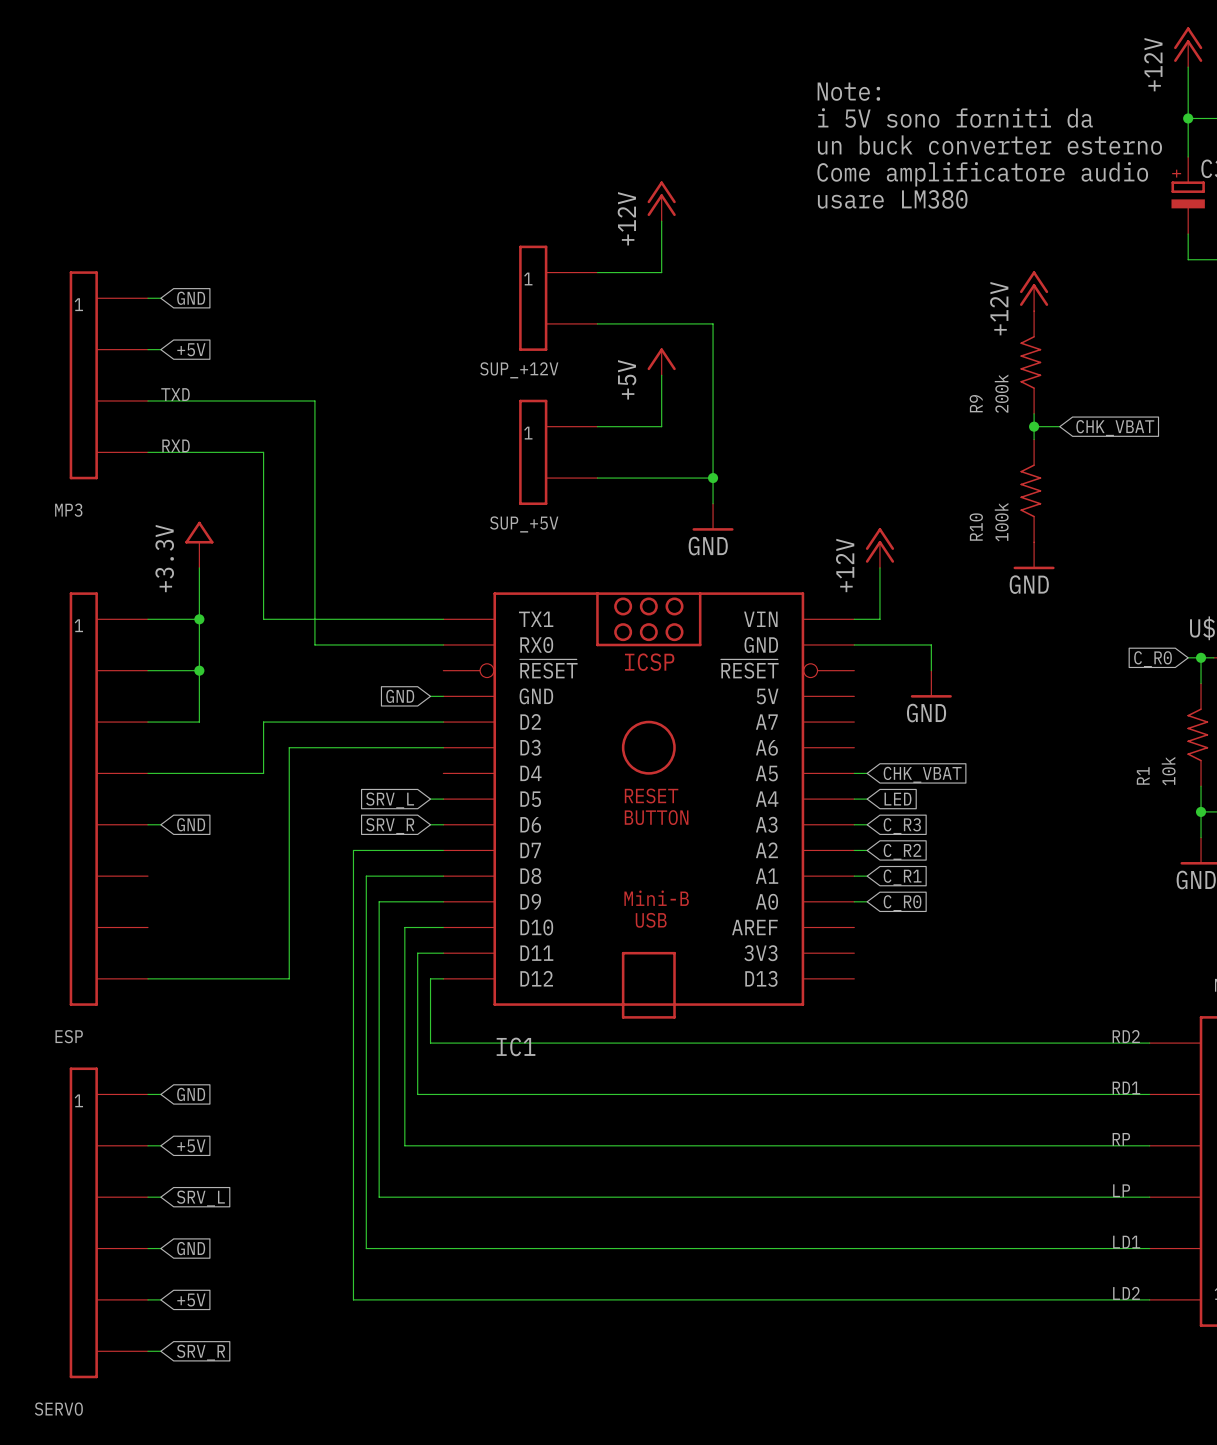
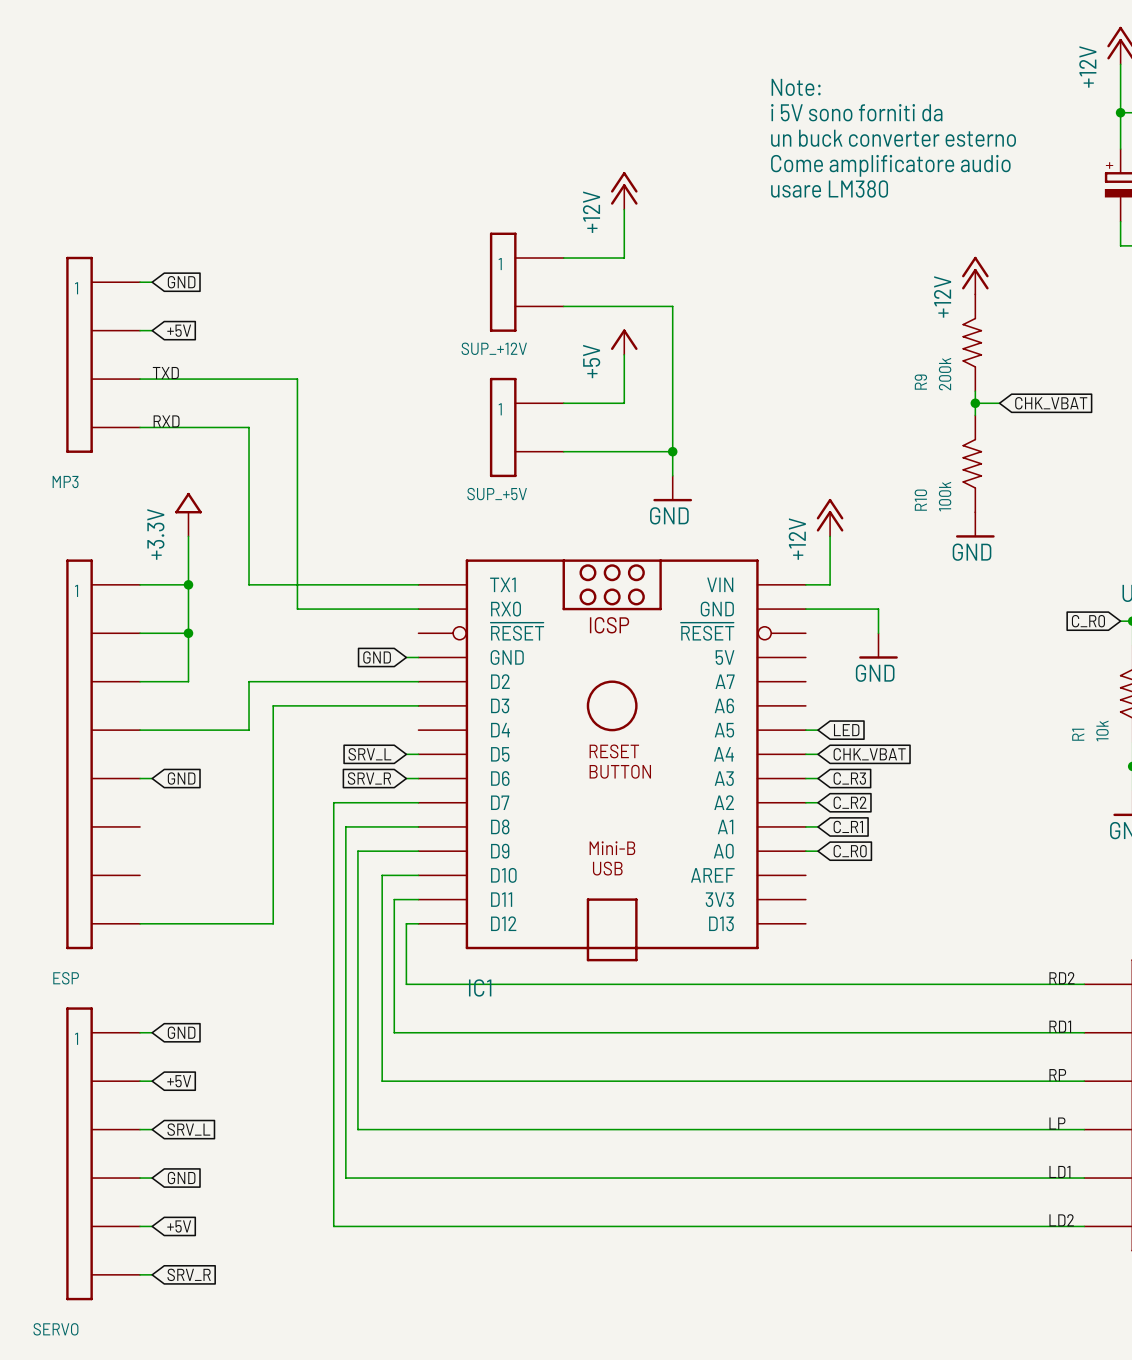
global label: CHK_VBAT (922, 774) -> LED (846, 730)
global label: LED (897, 799) -> CHK_VBAT (869, 754)

